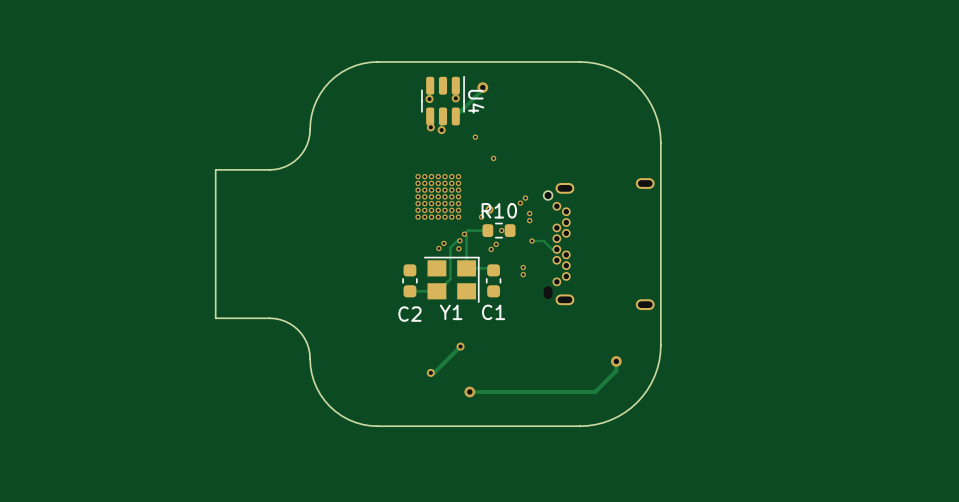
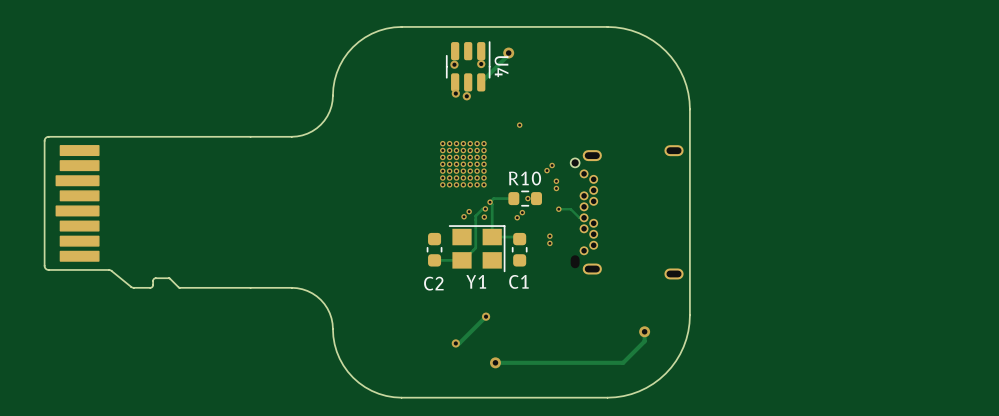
via: (475, 137) -> none
board edge: (229, 169) (215, 169) (215, 318) (229, 318) -> none
via: (489, 209) -> none
via: (481, 217) -> none
part: none -> (147, 212)

